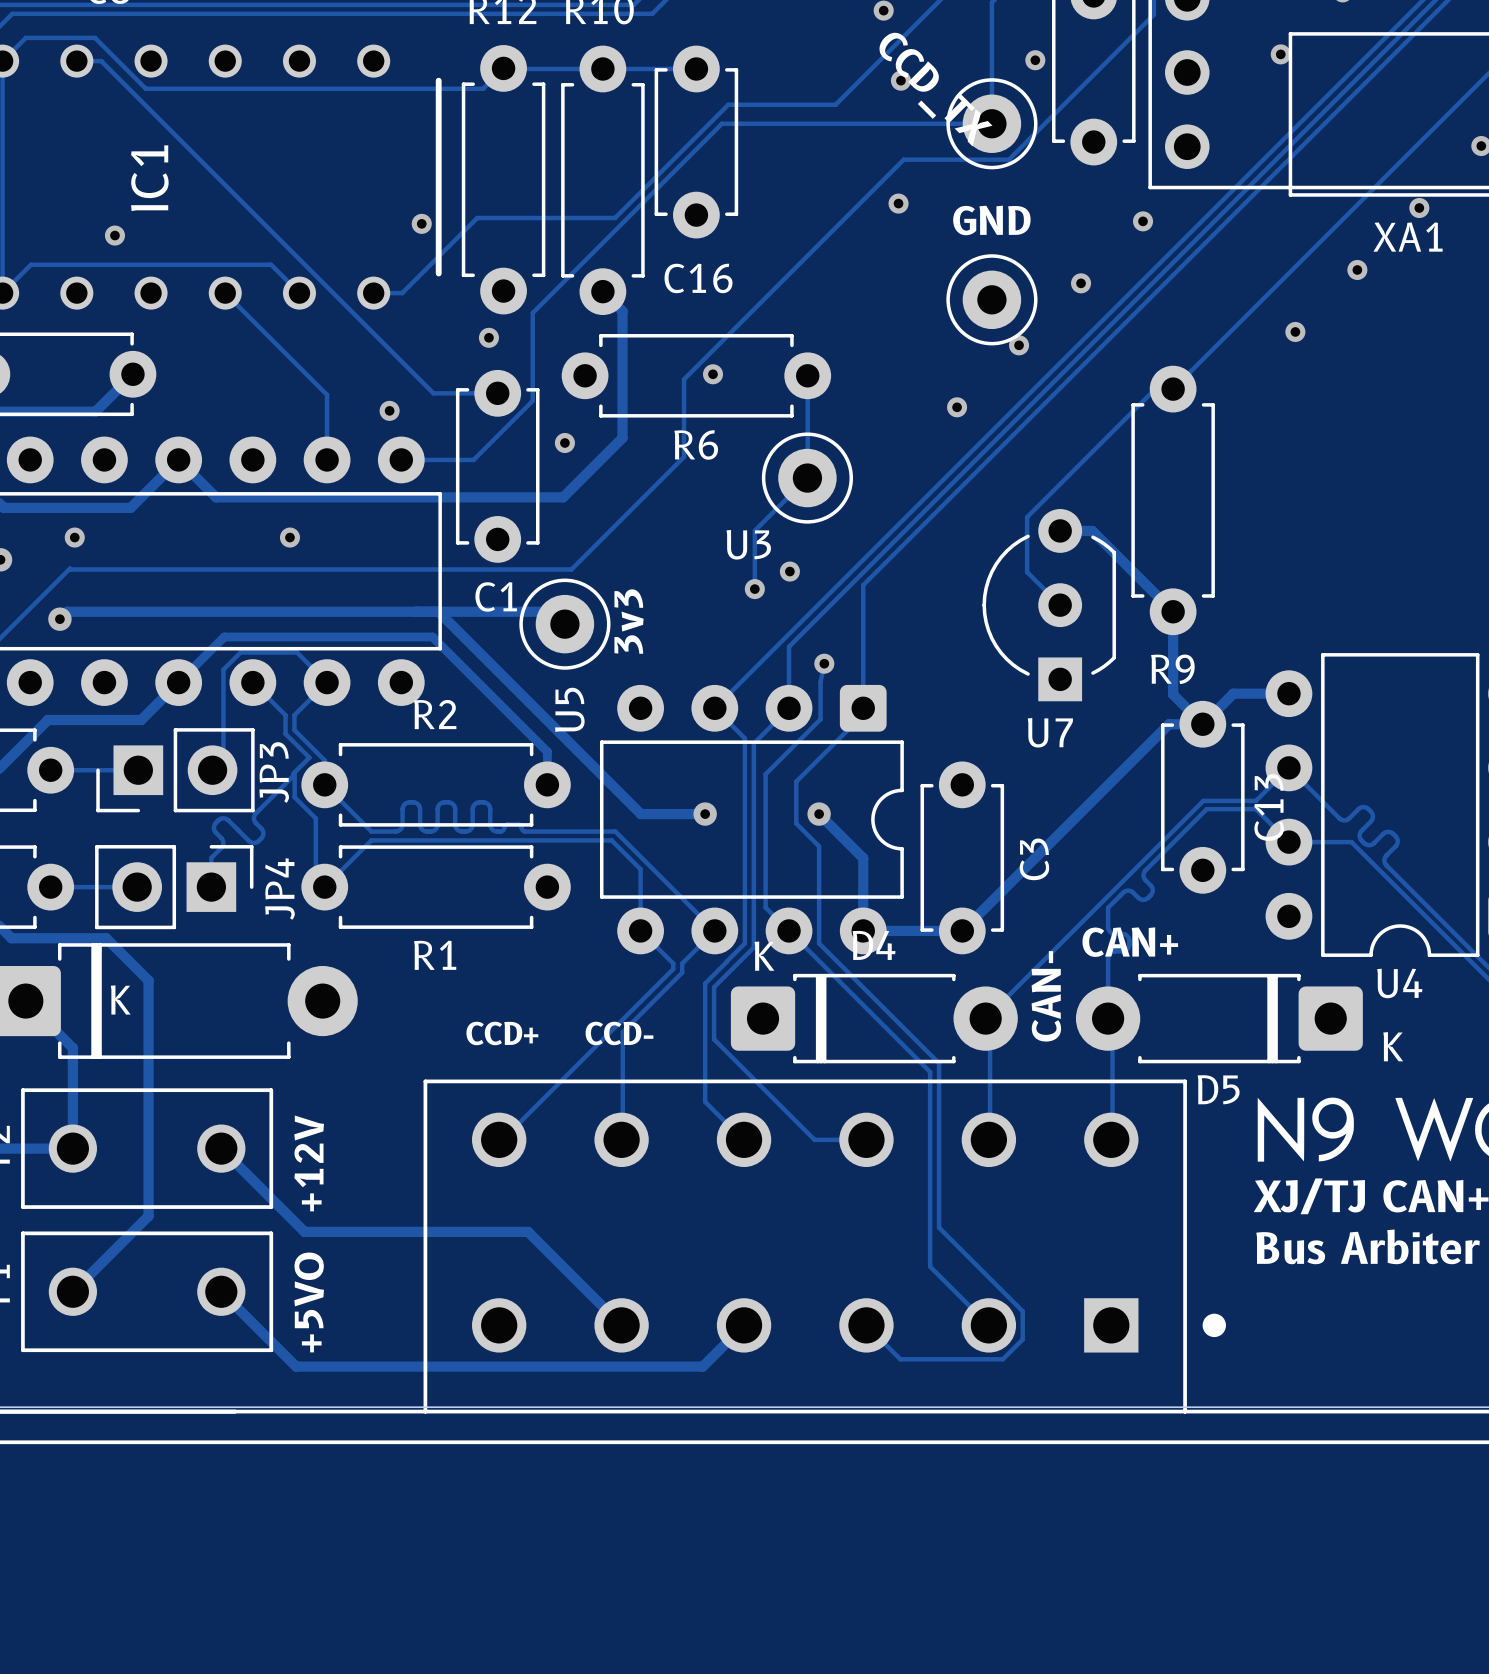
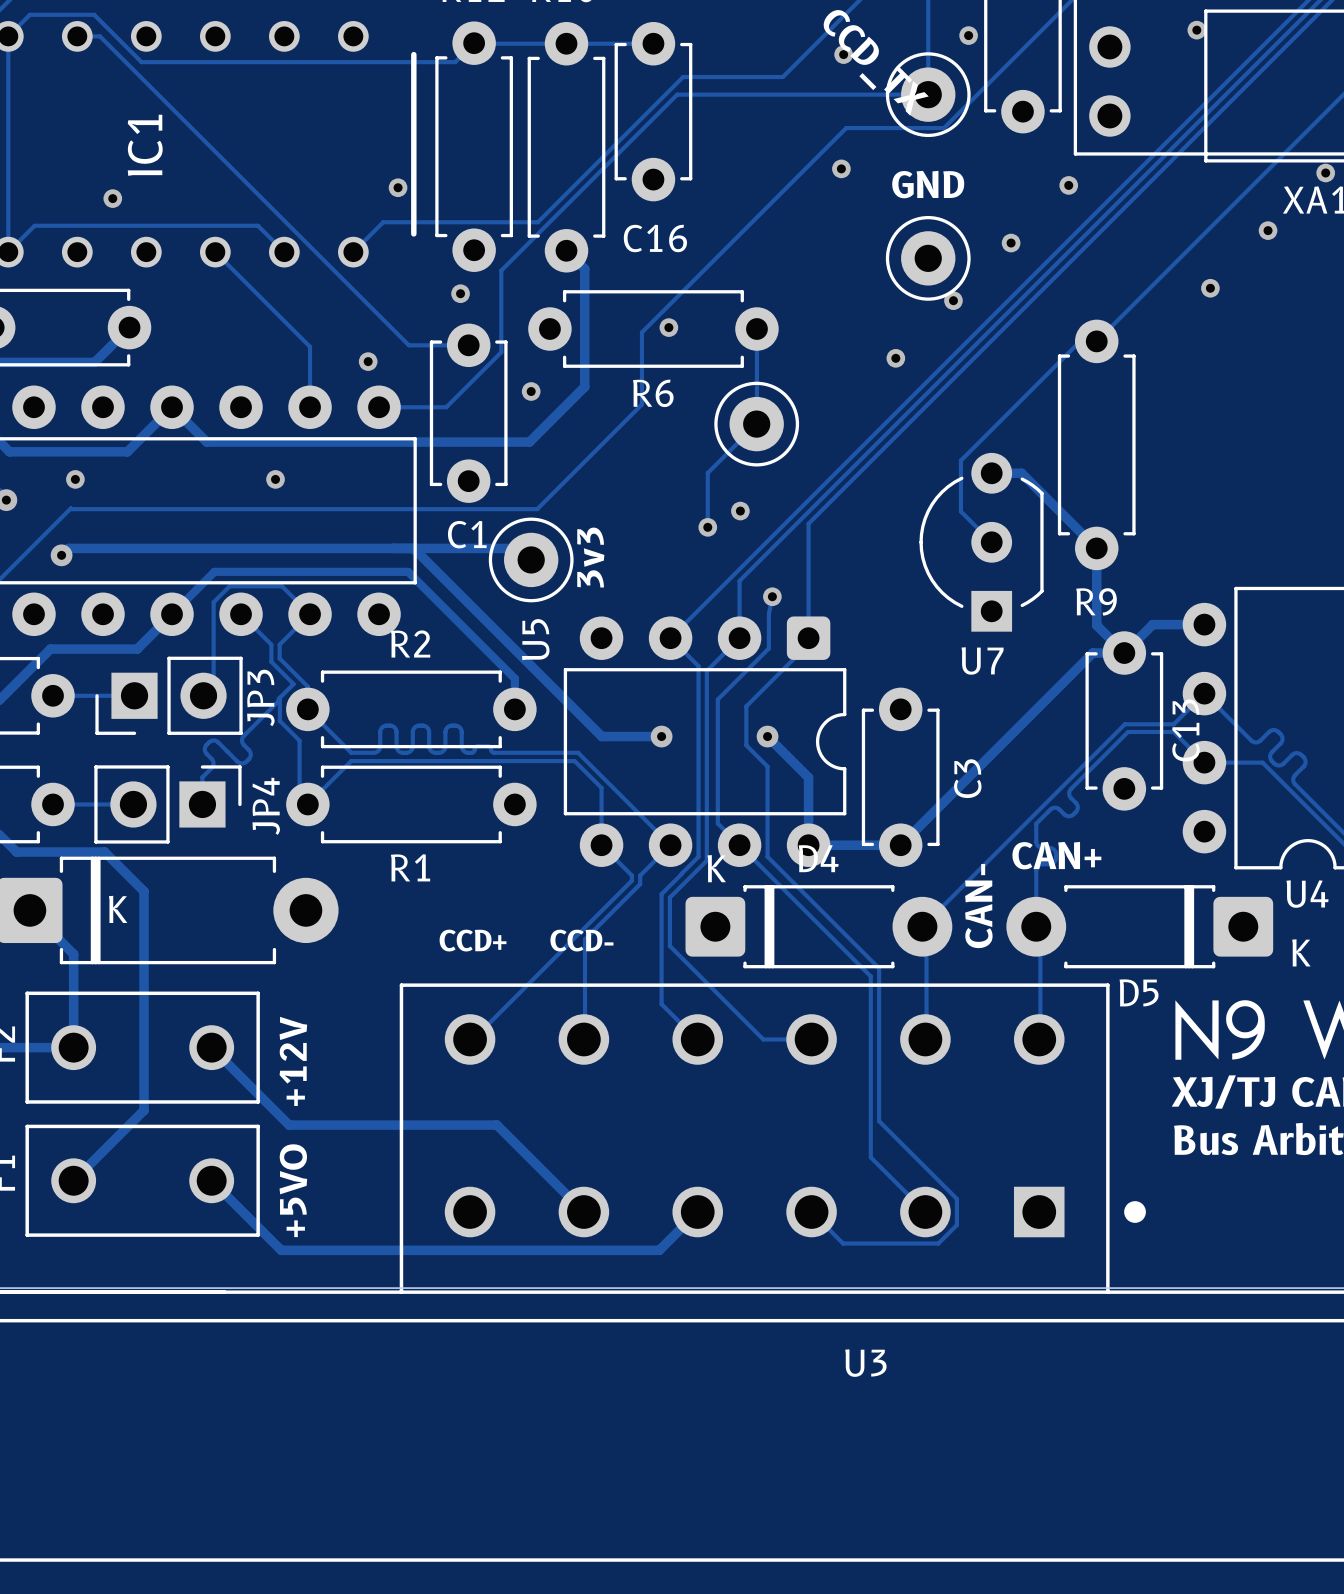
track: (615, 218) (477, 218) (402, 293) (373, 293) -> (577, 182) (537, 222) (383, 222) (353, 252)
U3 name position: U3 (748, 544) -> U3 (865, 1363)

